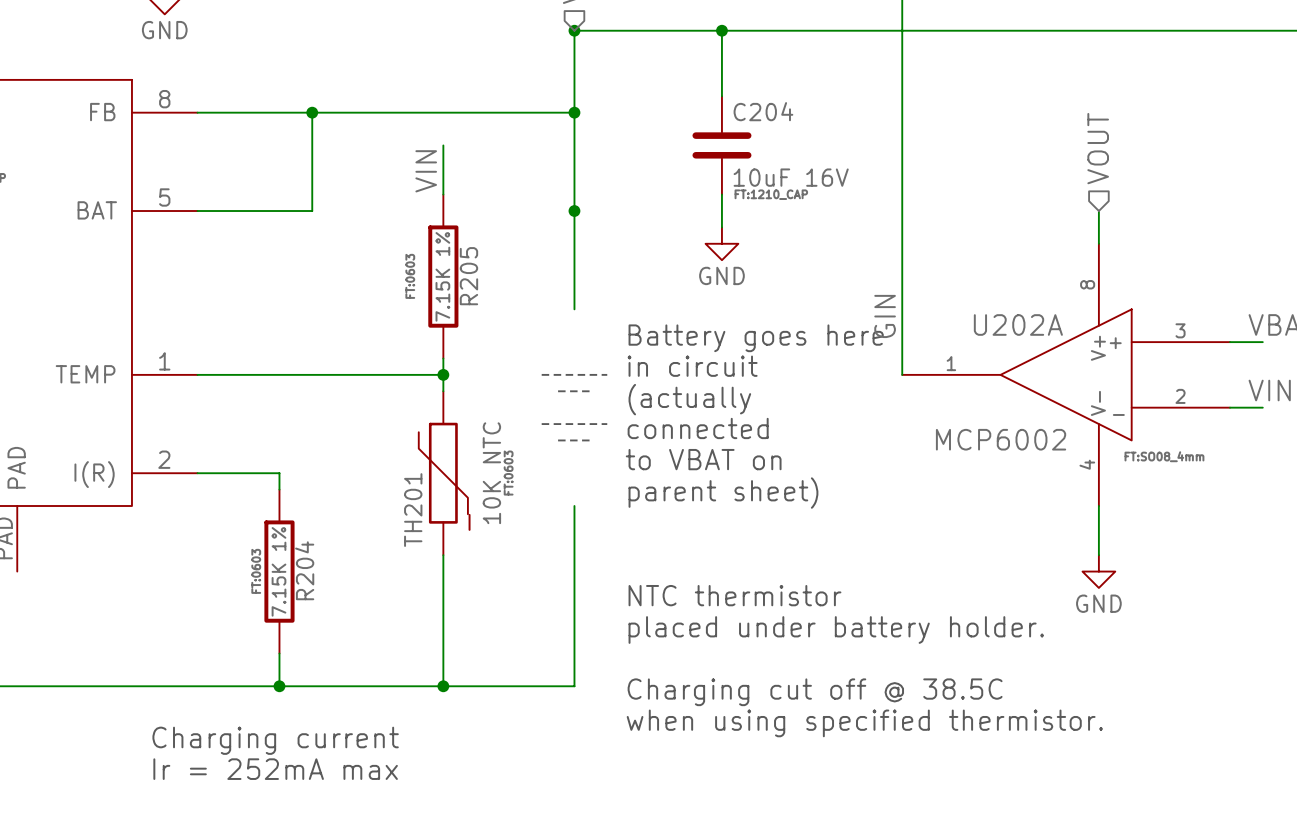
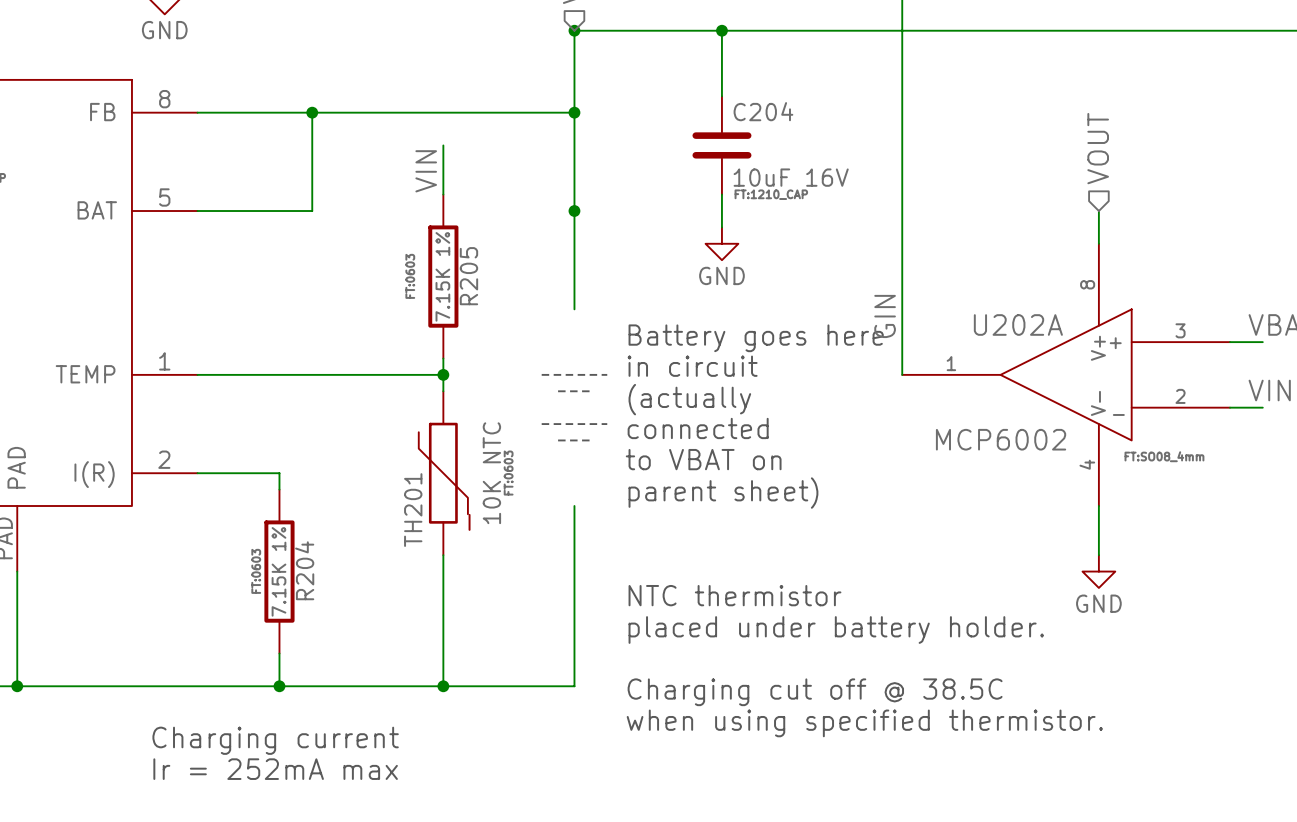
wire: none -> (17, 571) (17, 686)
junction: none -> (17, 686)

